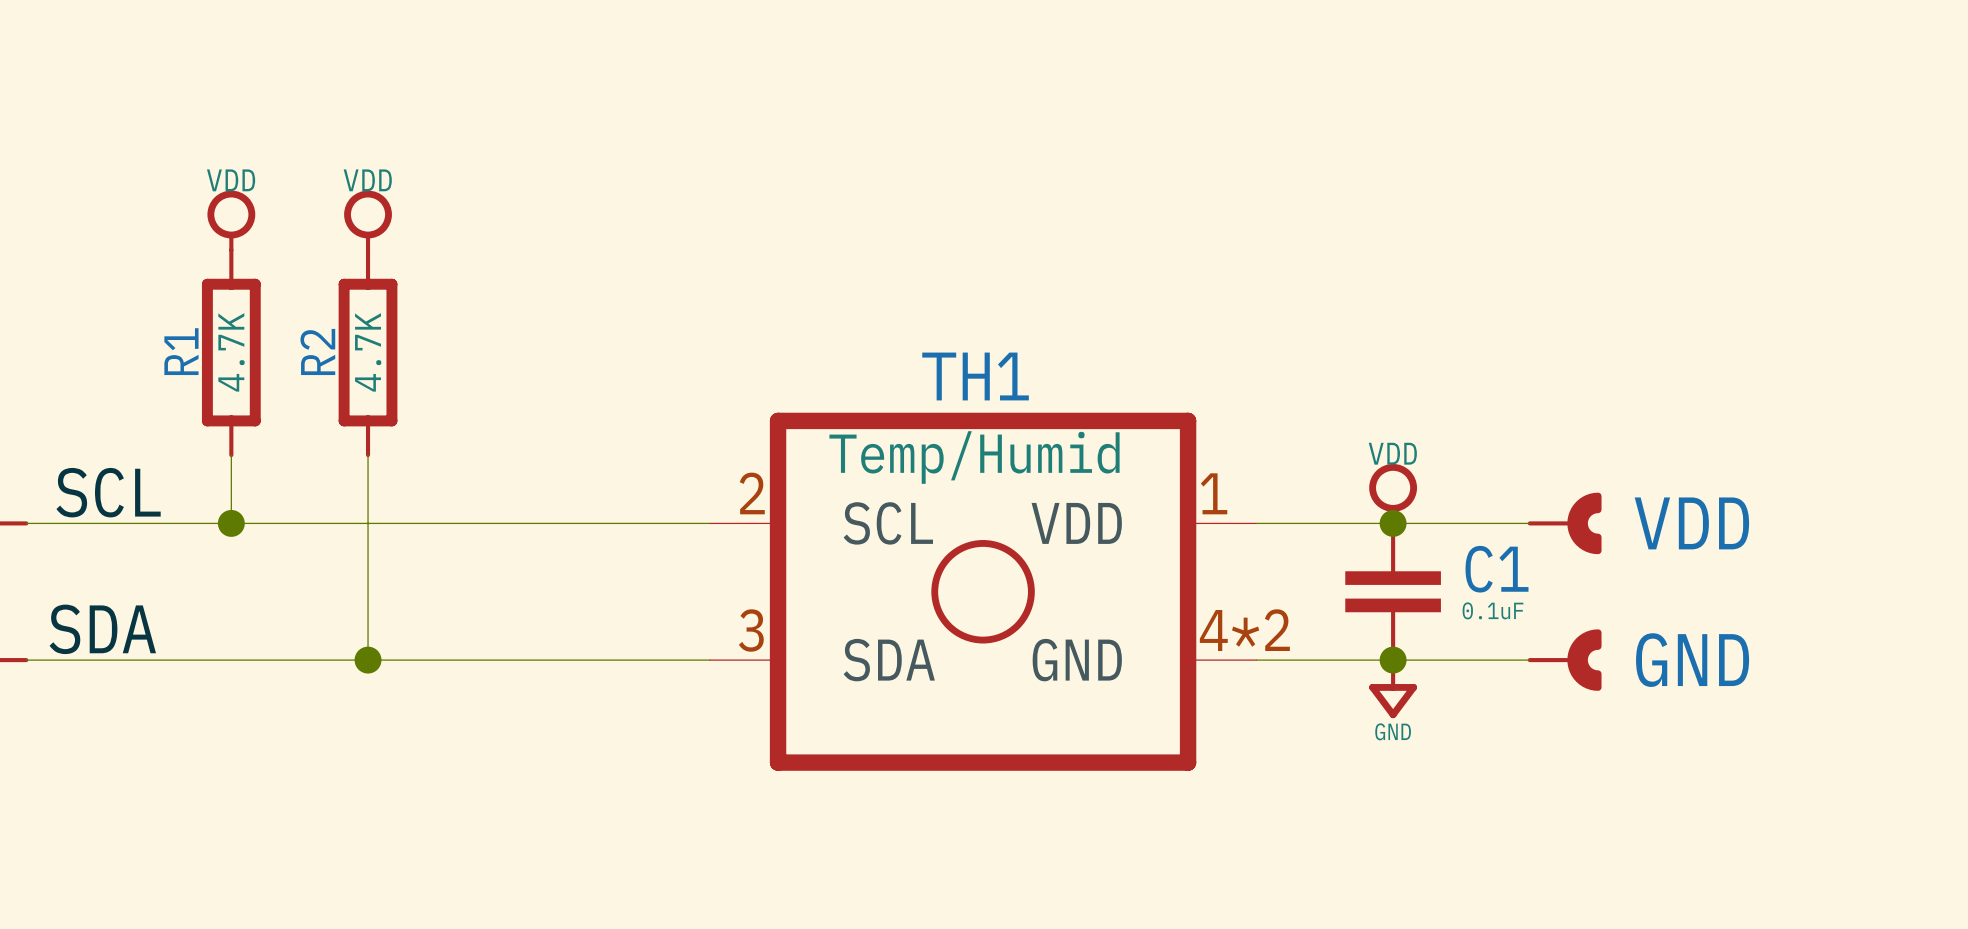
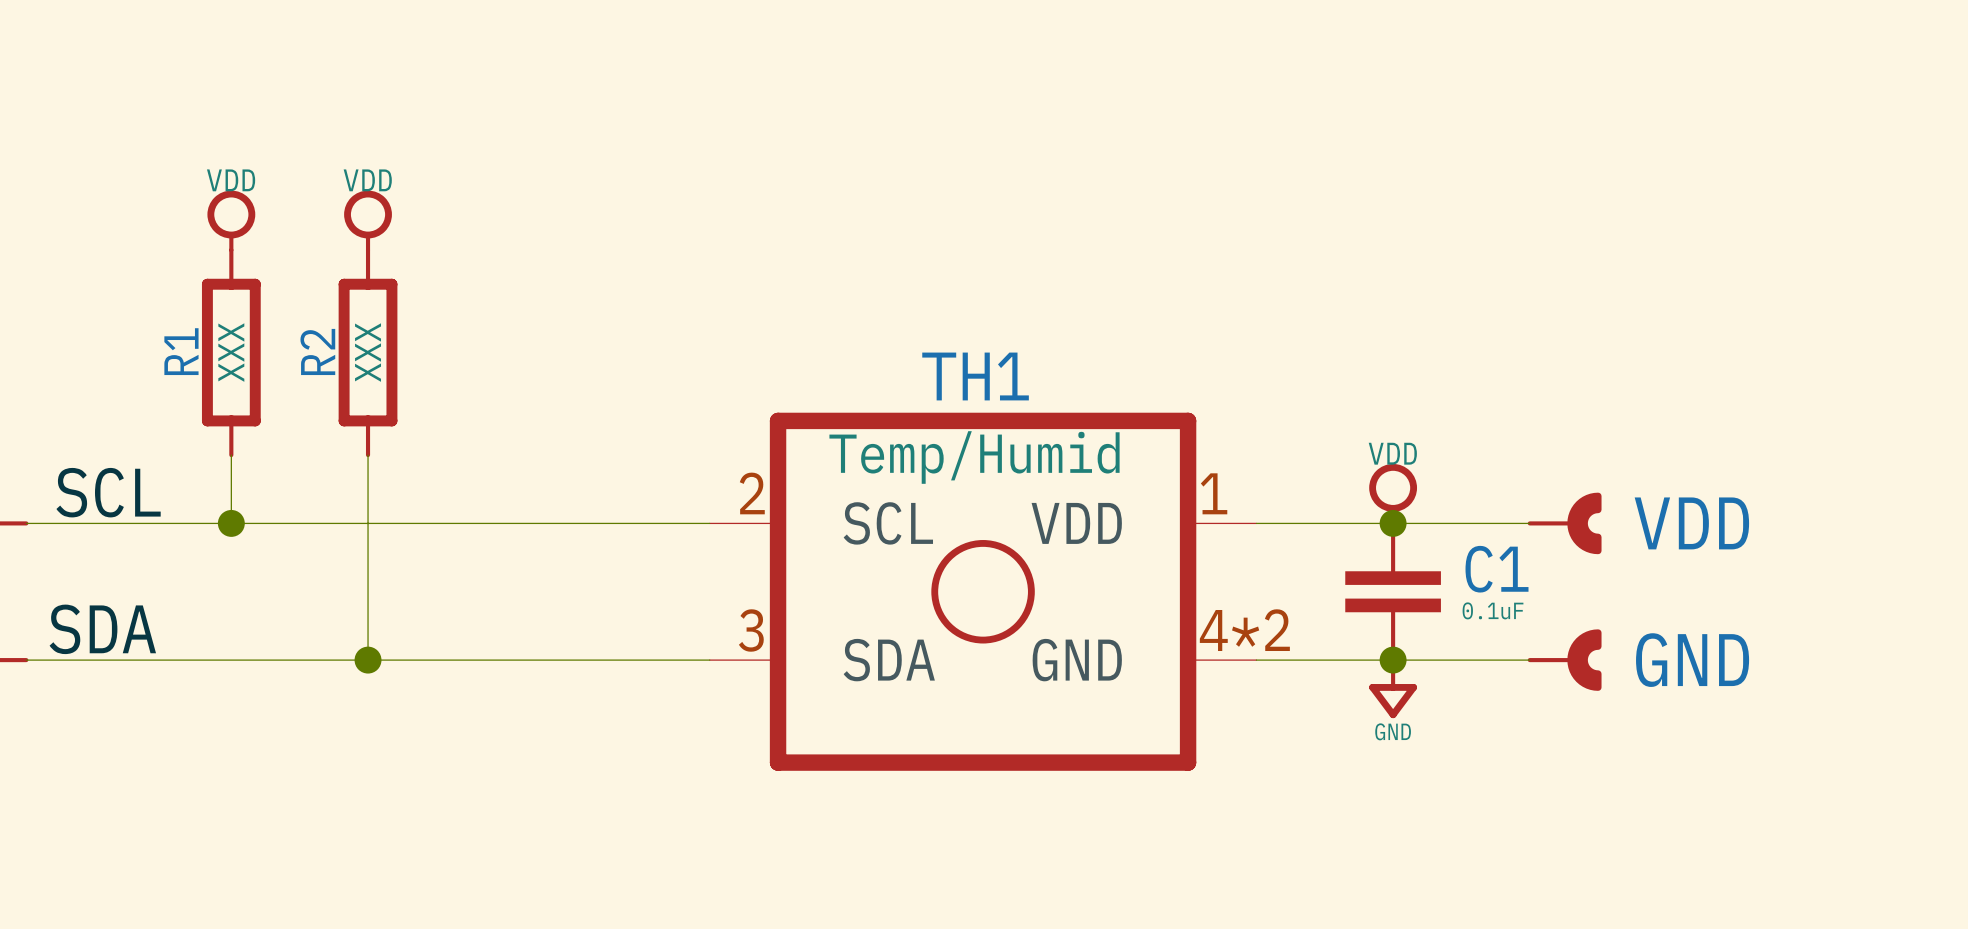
R1 value: 4.7K (231, 352) -> XXX (231, 352)
R2 value: 4.7K (368, 352) -> XXX (368, 352)

